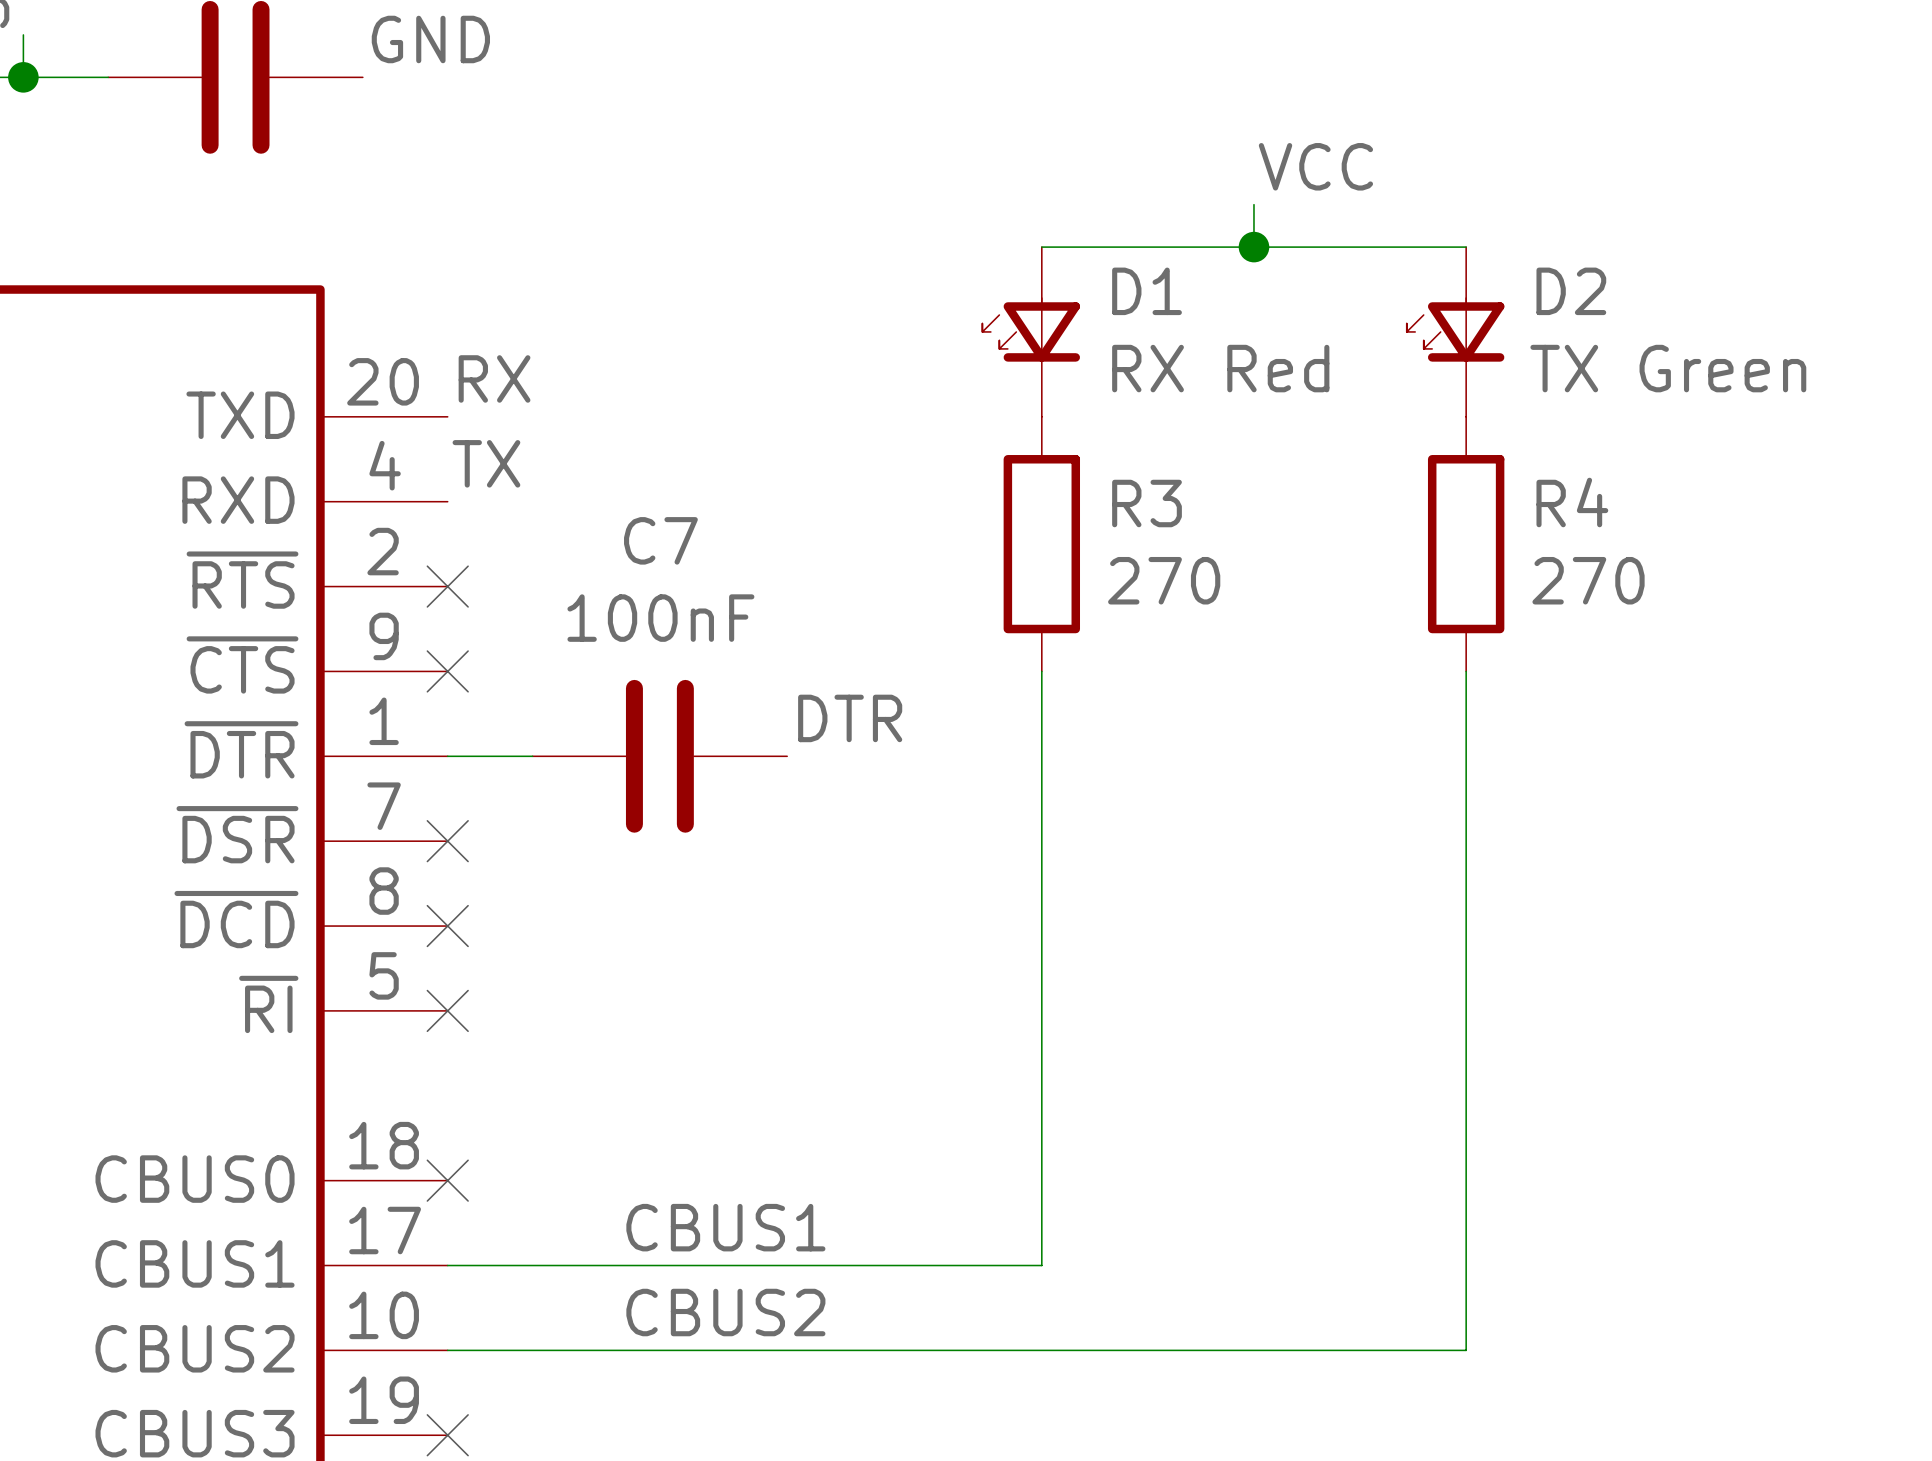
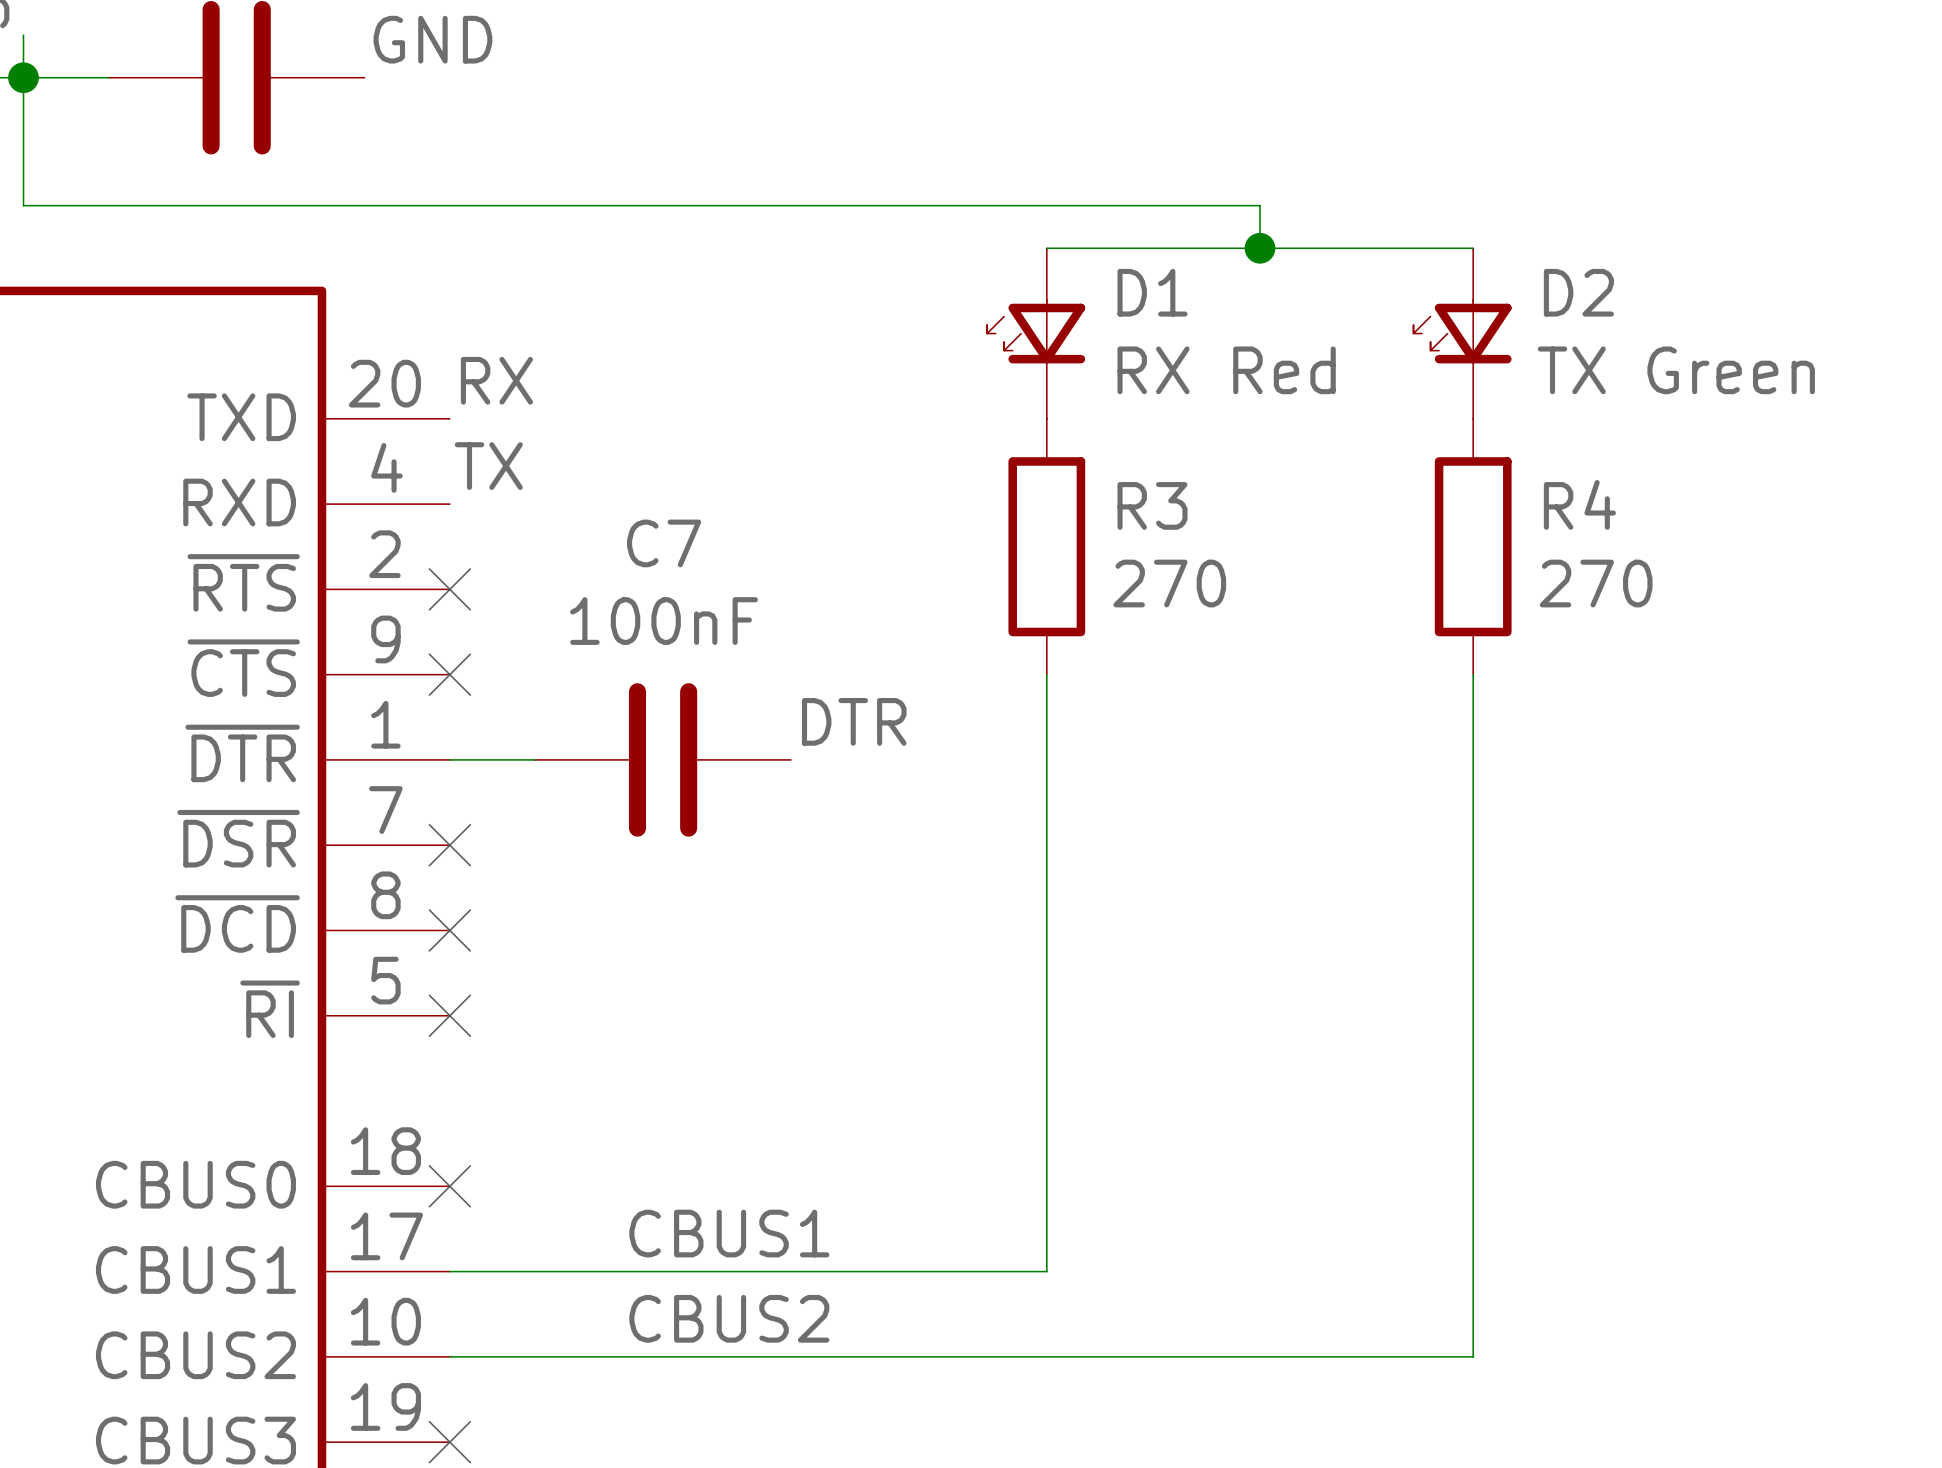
wire: none -> (23, 77) (23, 205) (1260, 205)
label: VCC (1315, 166) -> none

